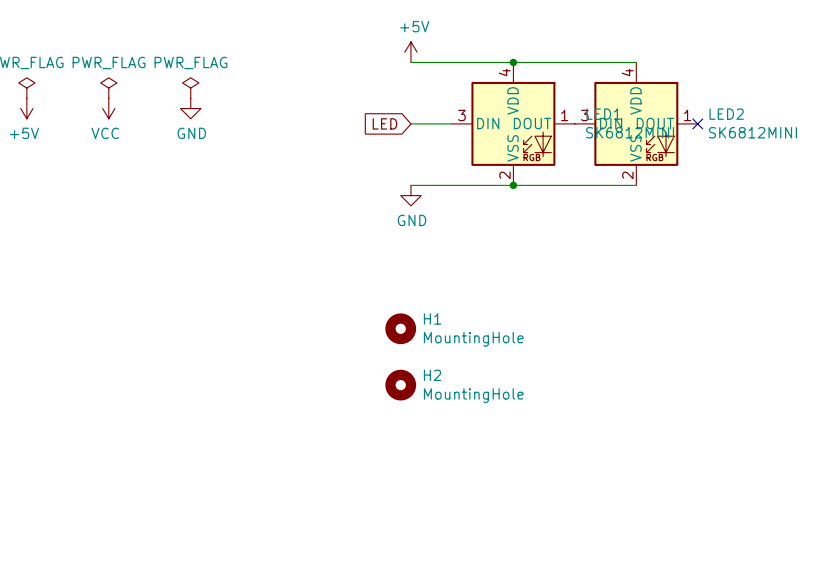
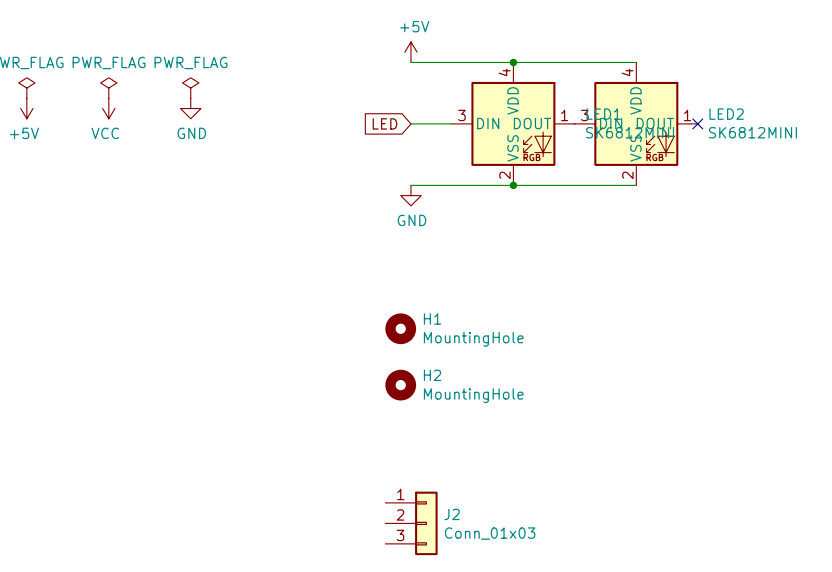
J2: none -> Conn_01x03 (411, 523)

